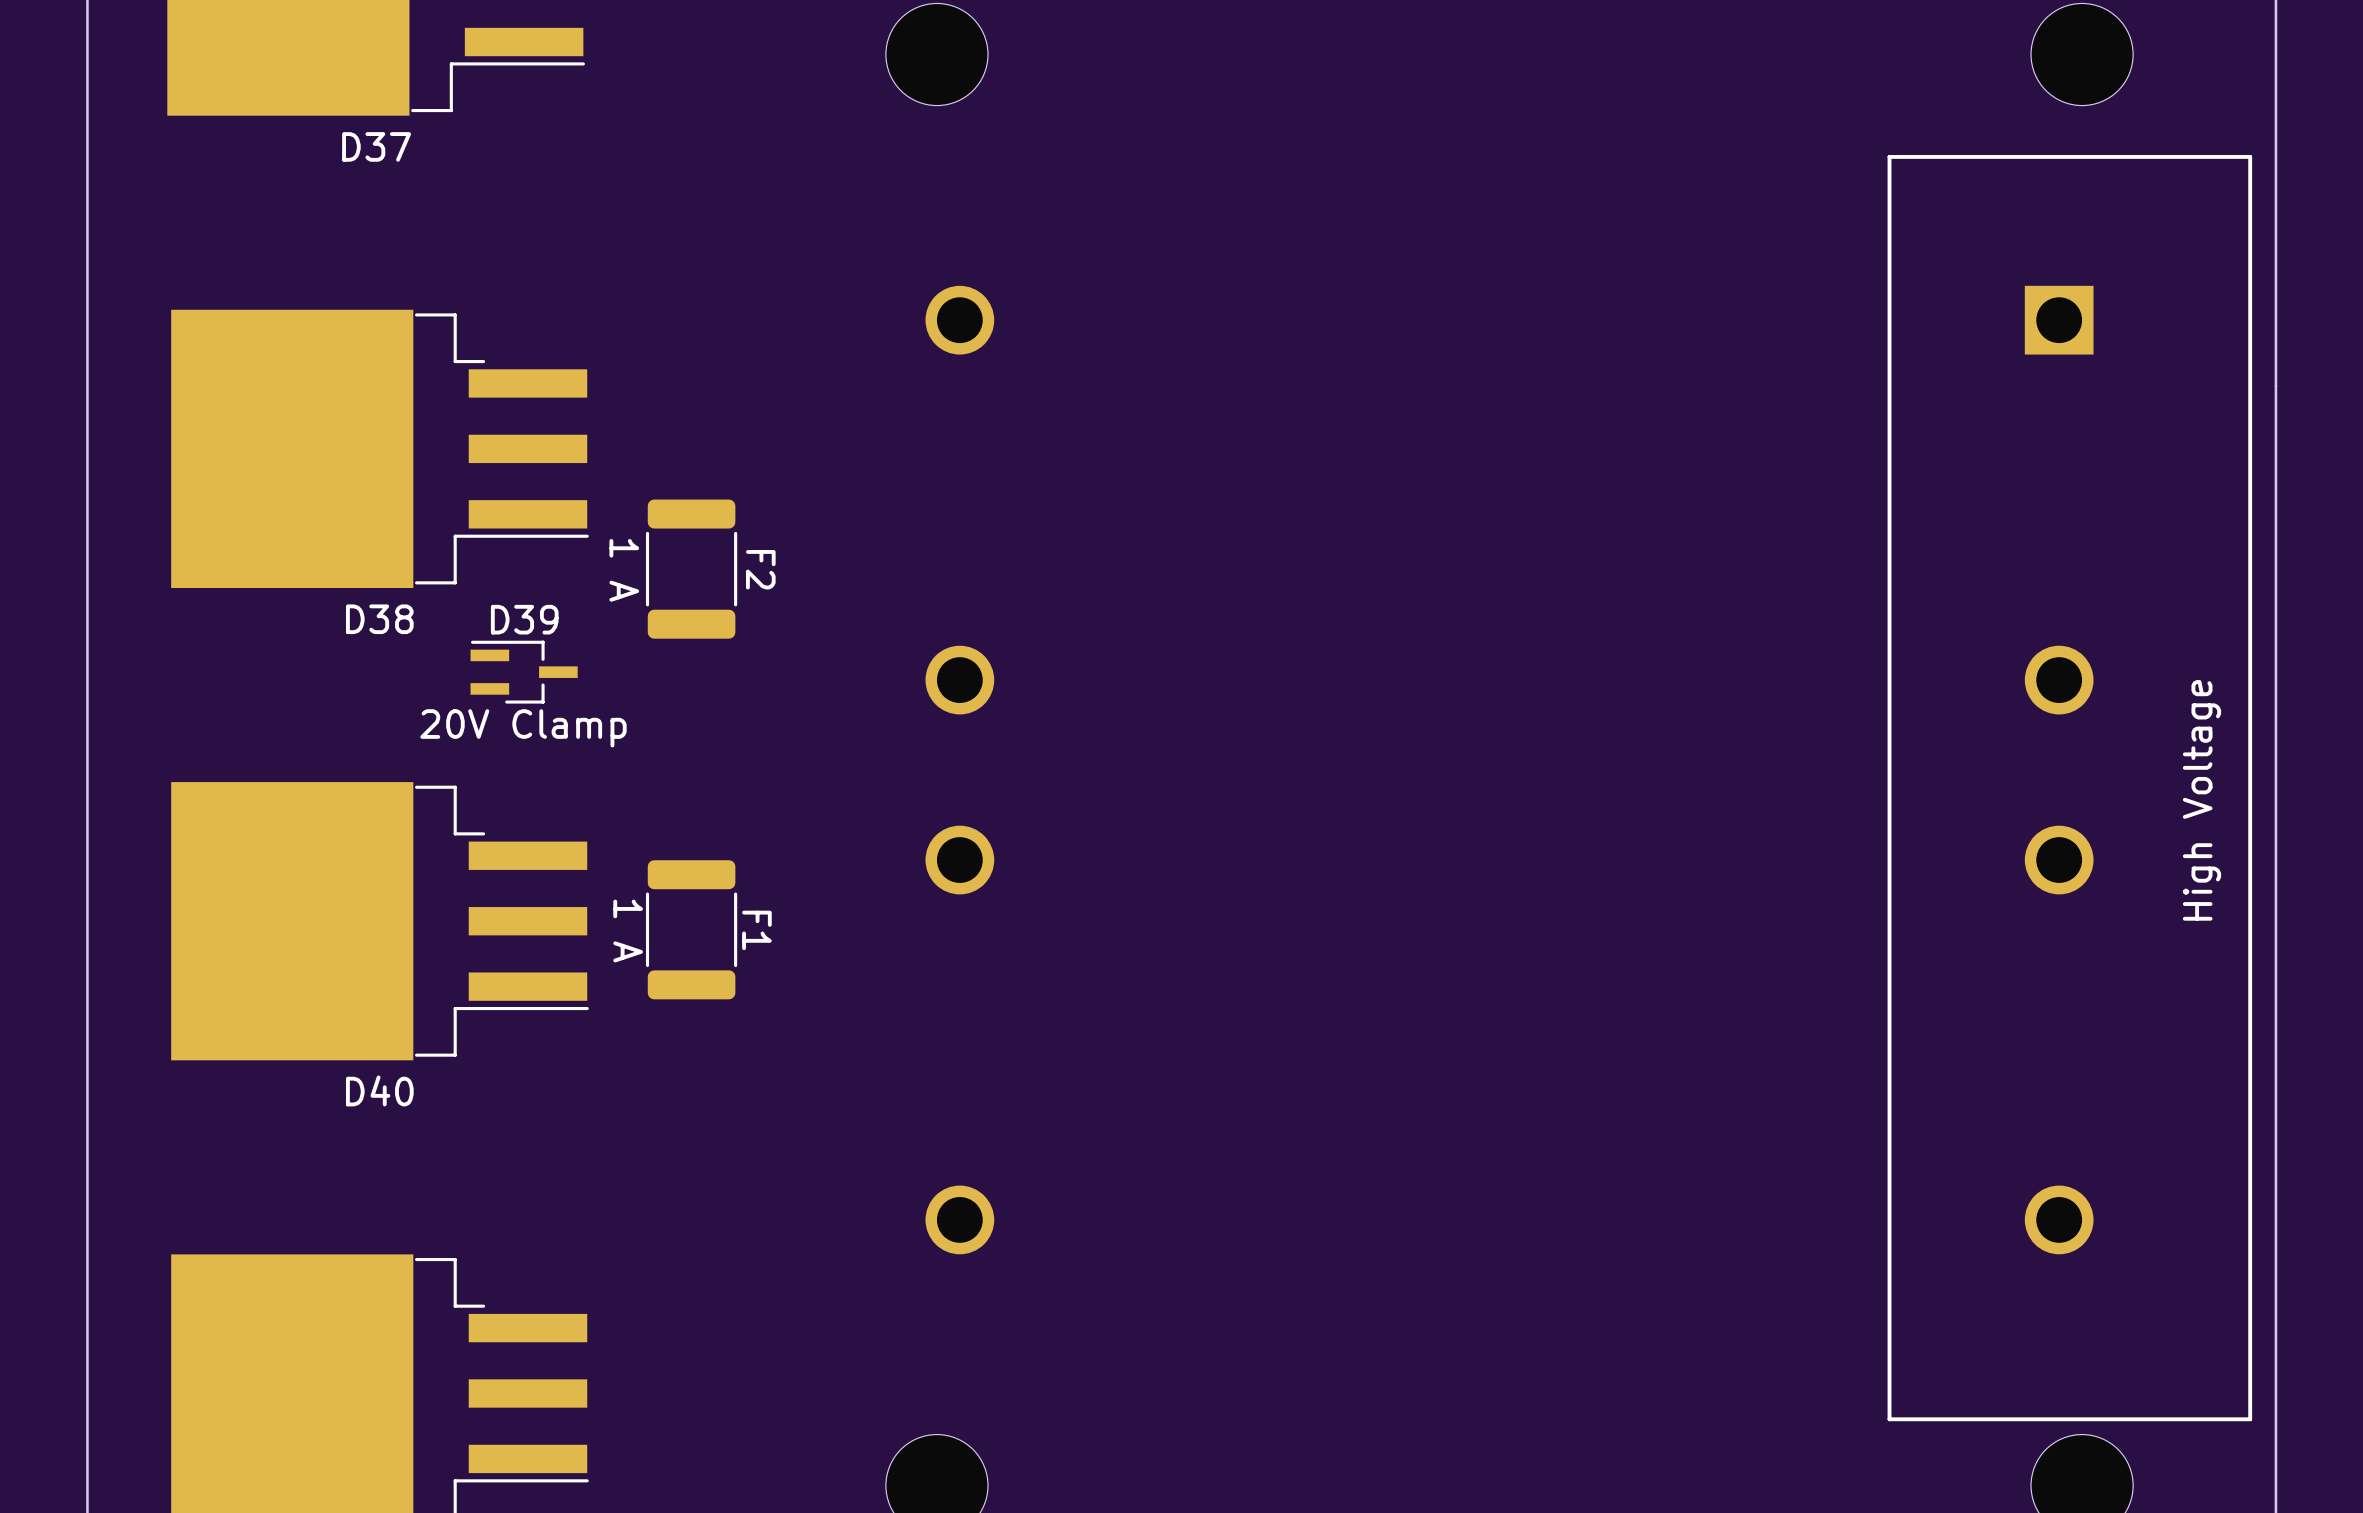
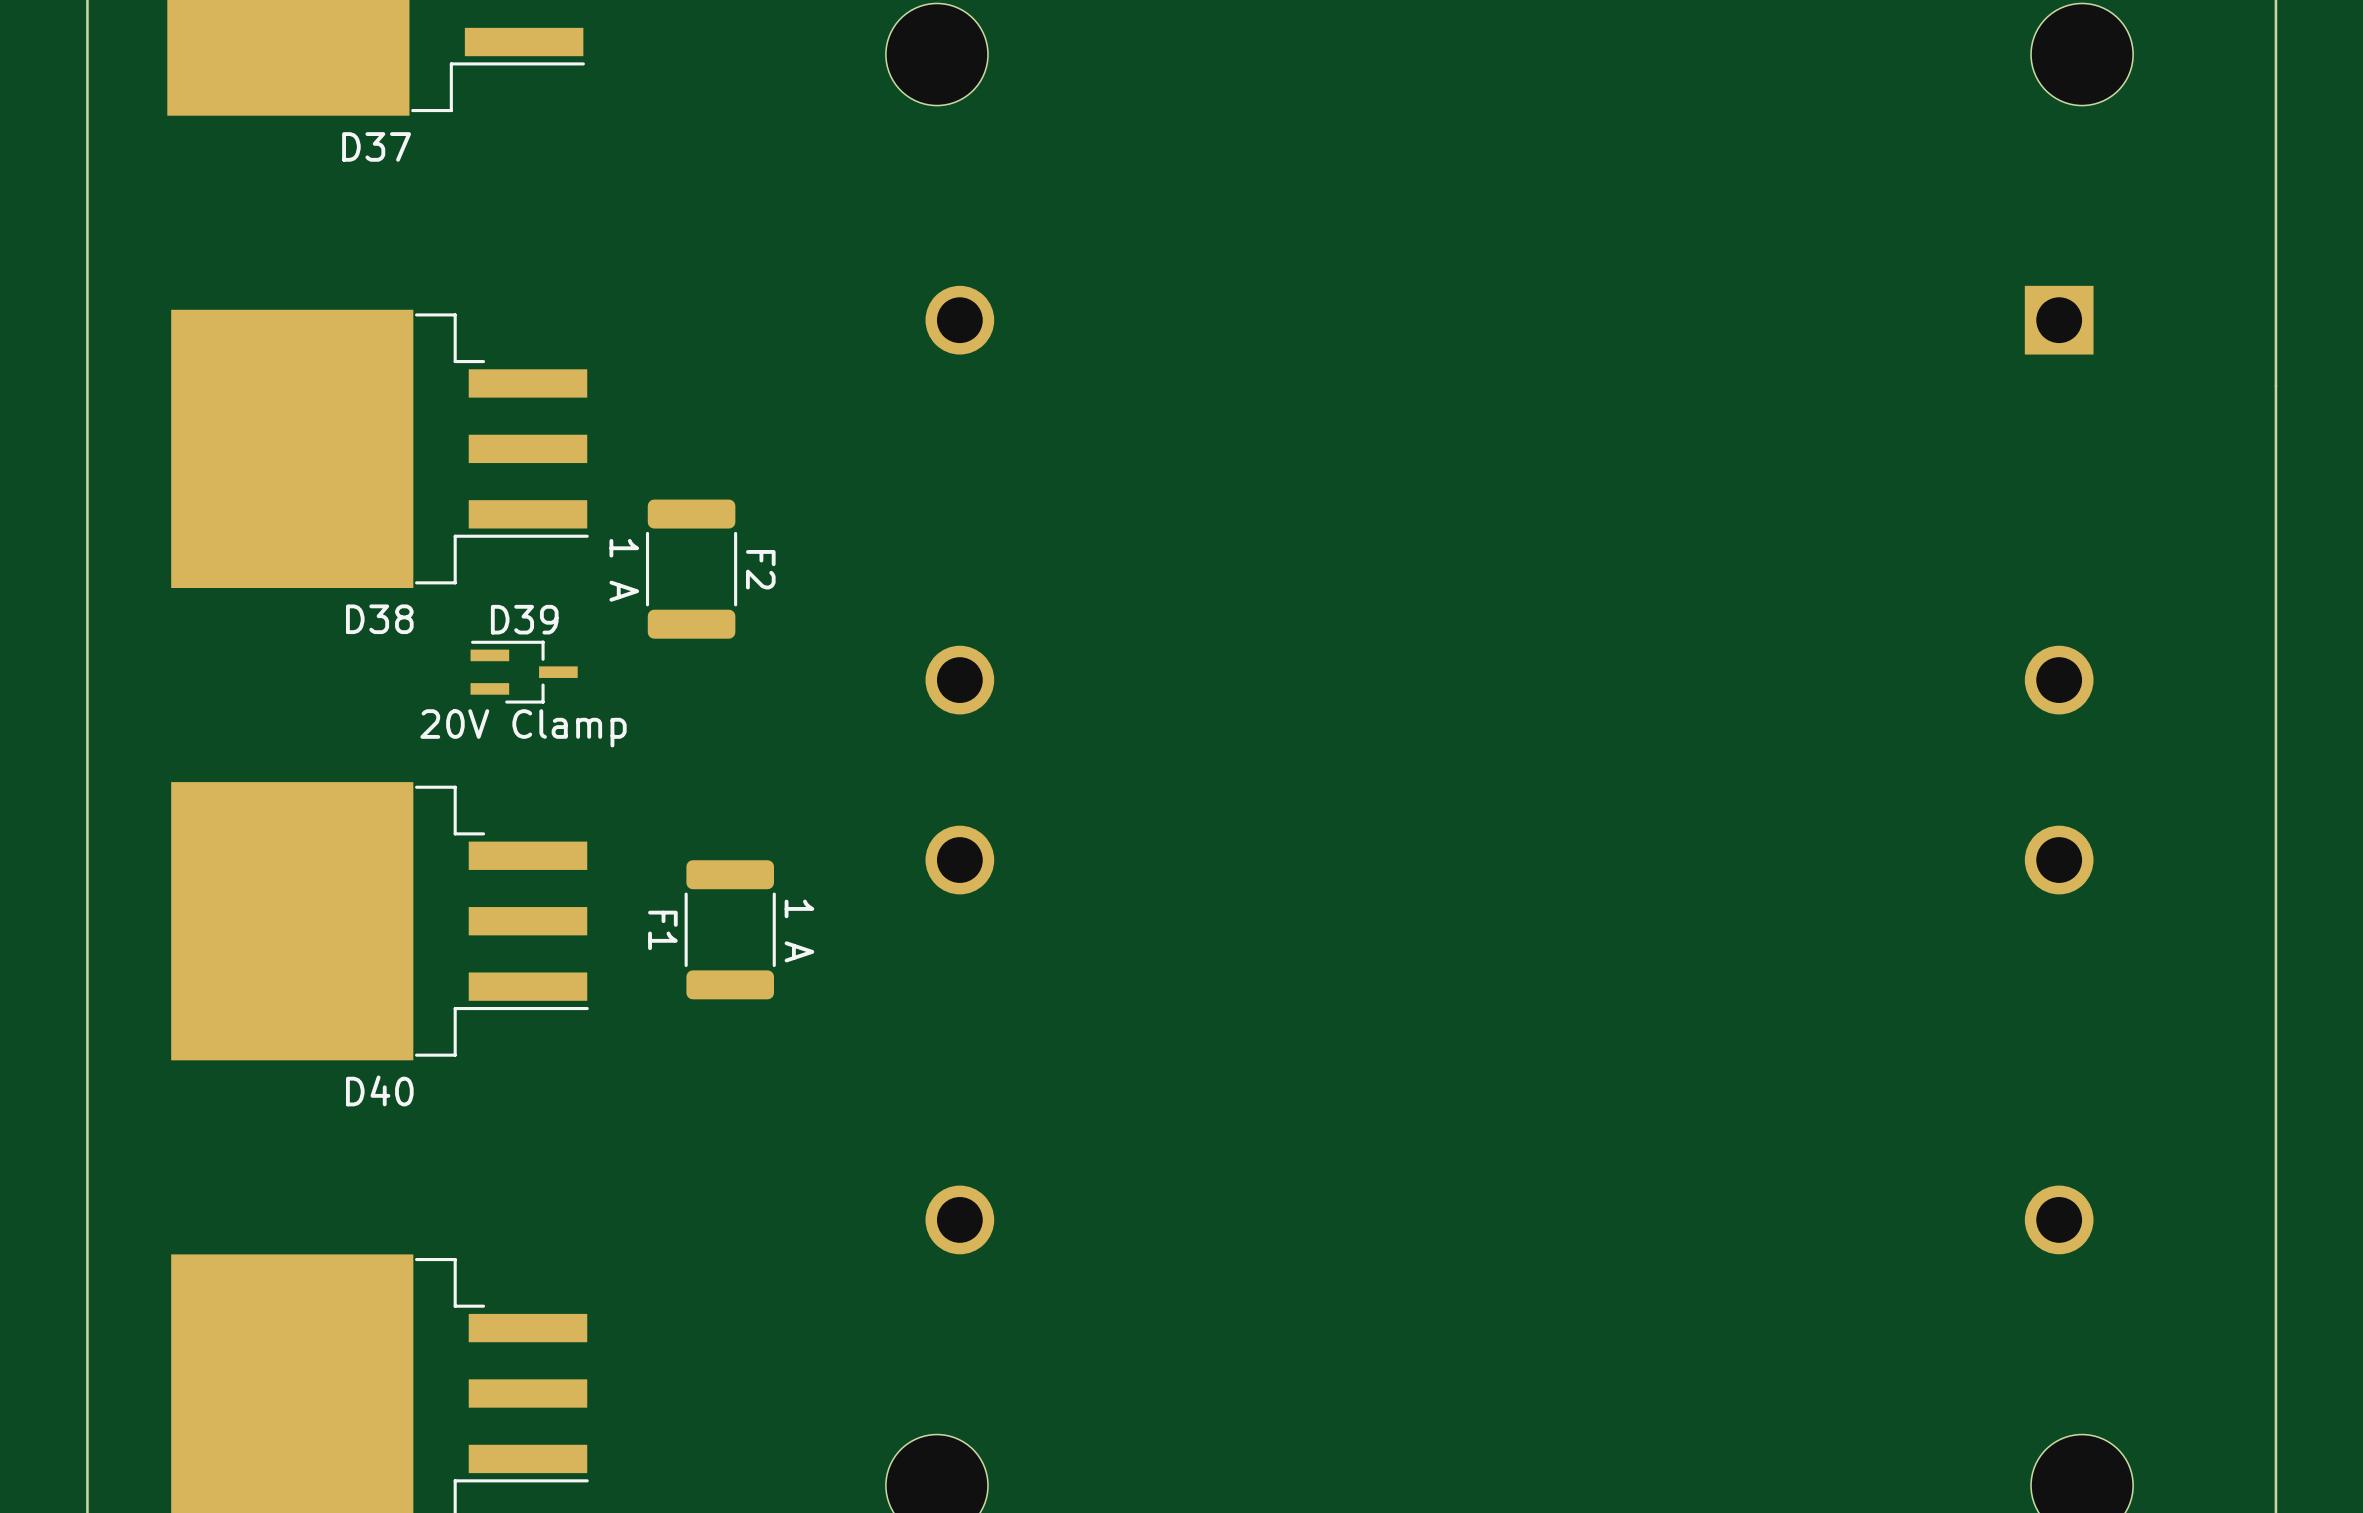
line: (2250, 156) (2250, 1419) (1889, 1419) (1889, 156) (2250, 156) -> none
text: High Voltage (2201, 800) -> none
F1 position: (691, 929) -> (730, 929)
F1 name position: F1 (756, 930) -> F1 (662, 930)
F1 value position: 1 A (628, 931) -> 1 A (799, 931)

